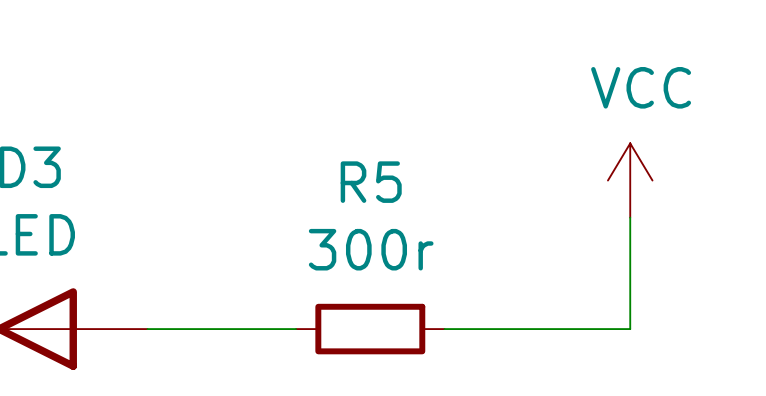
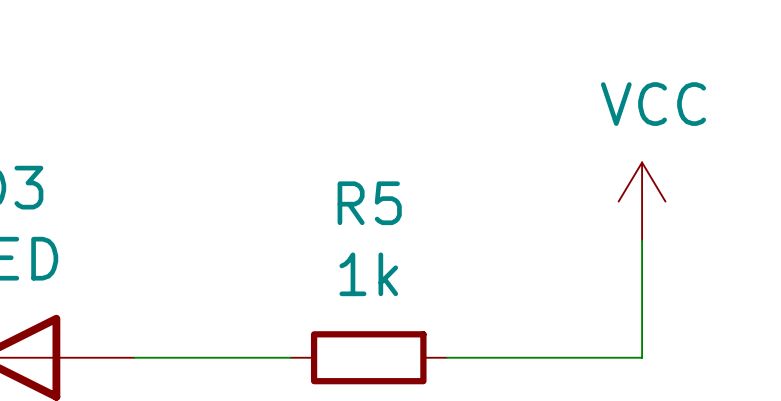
R5 value: 300r (371, 249) -> 1k (368, 274)

